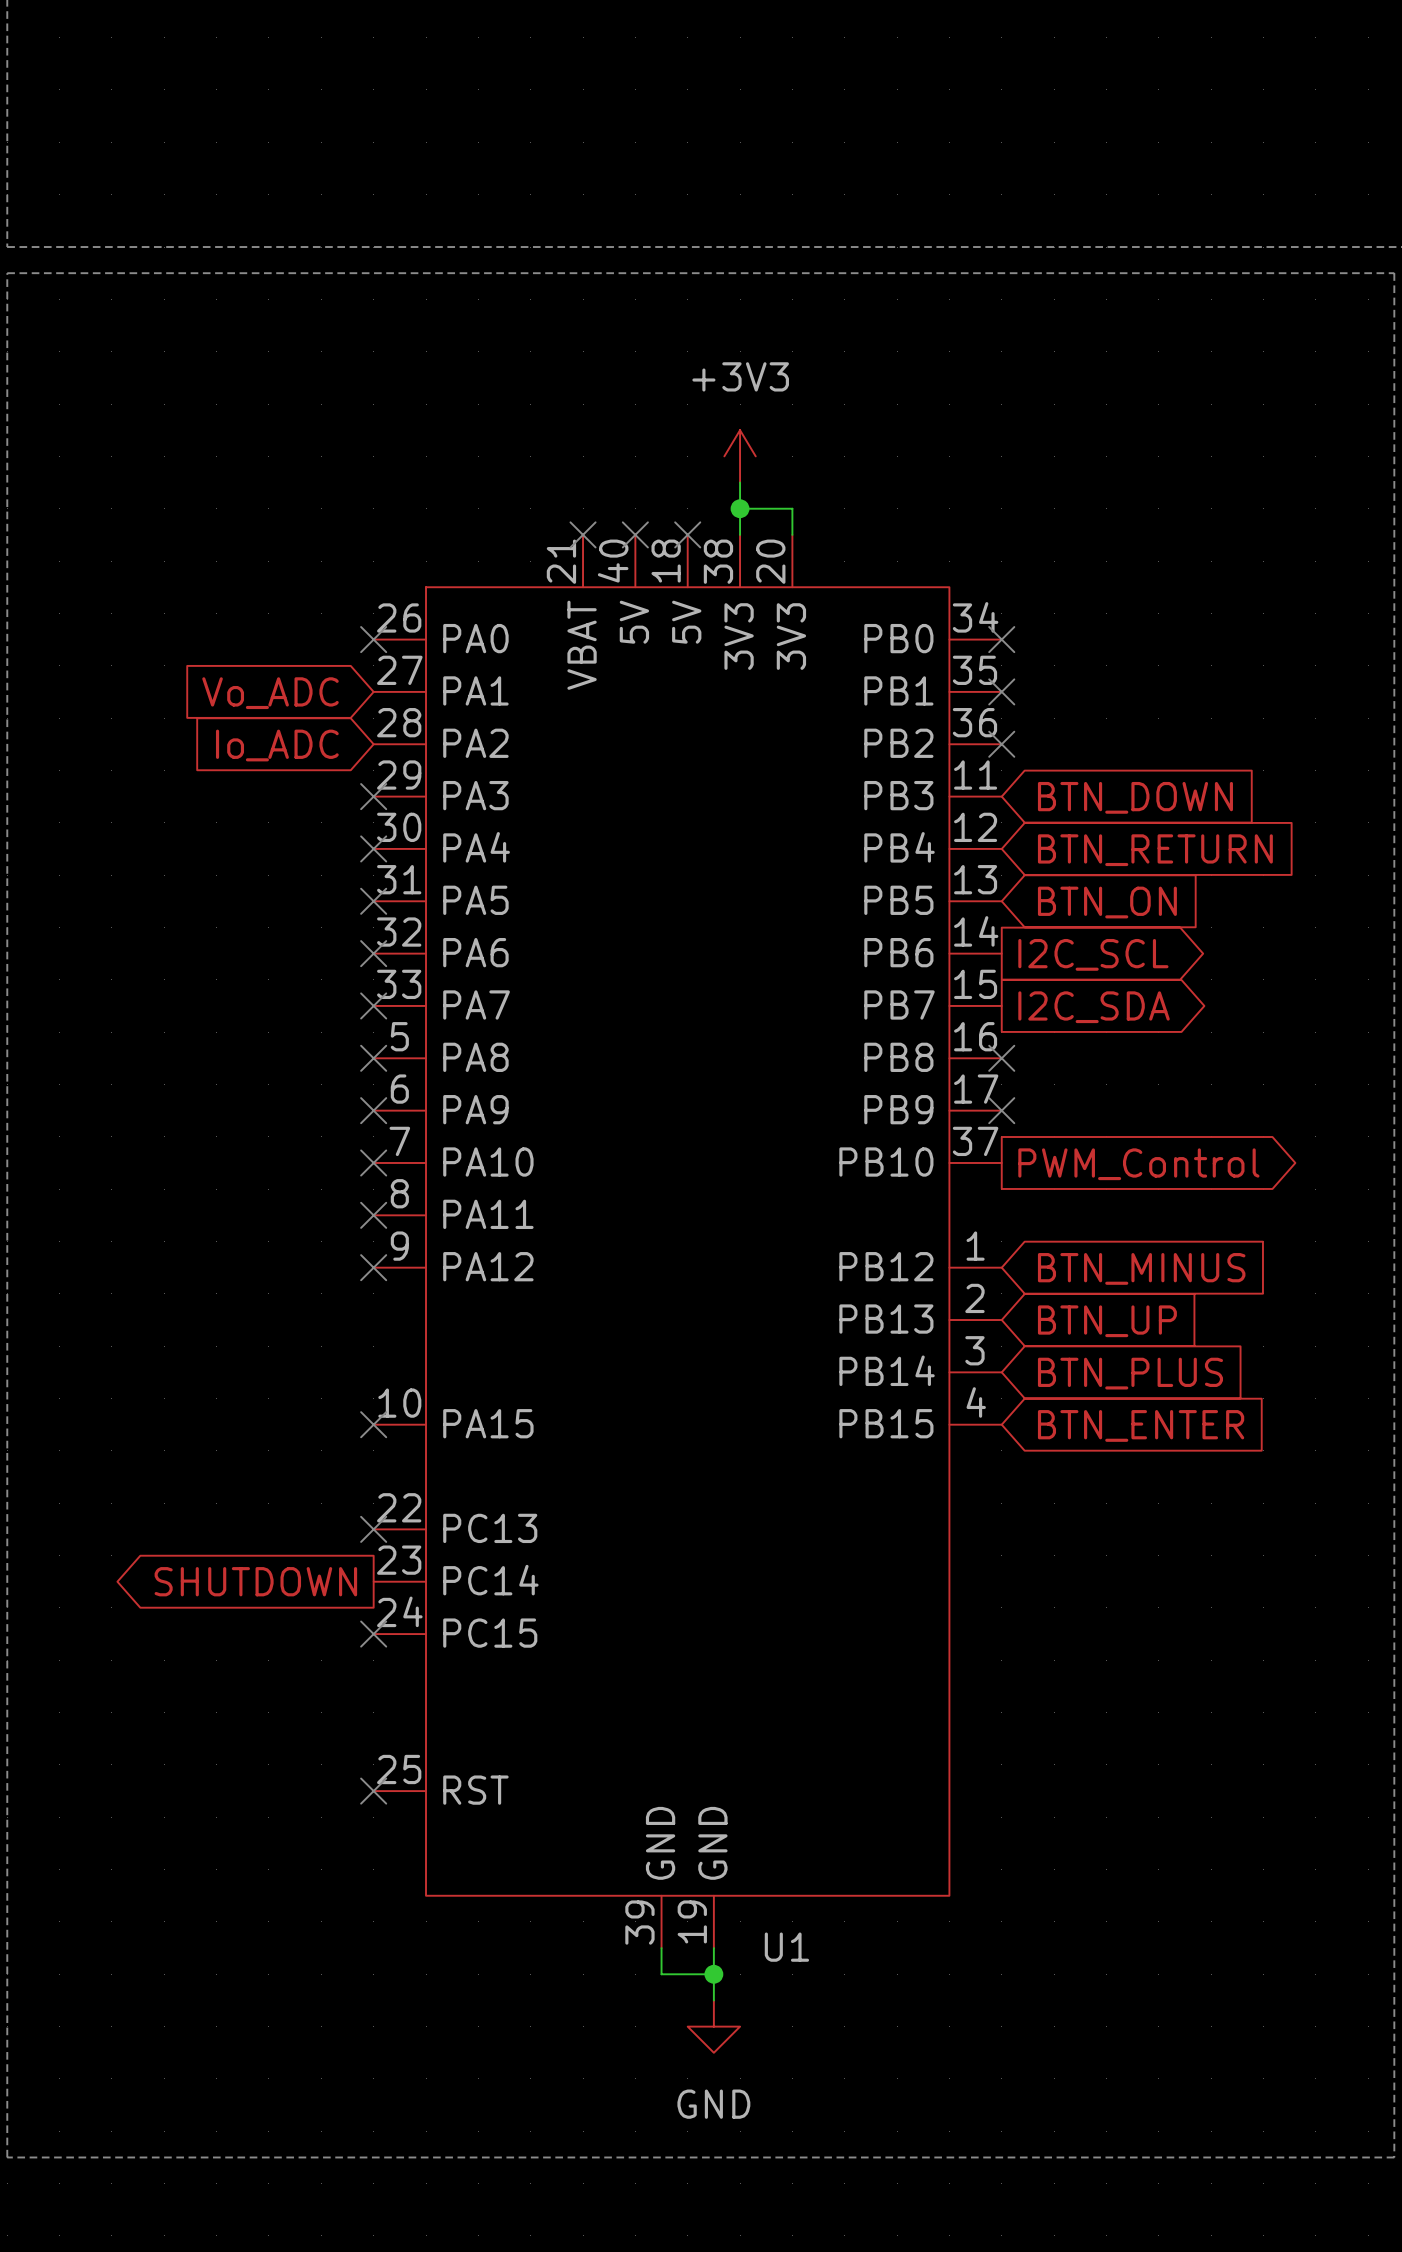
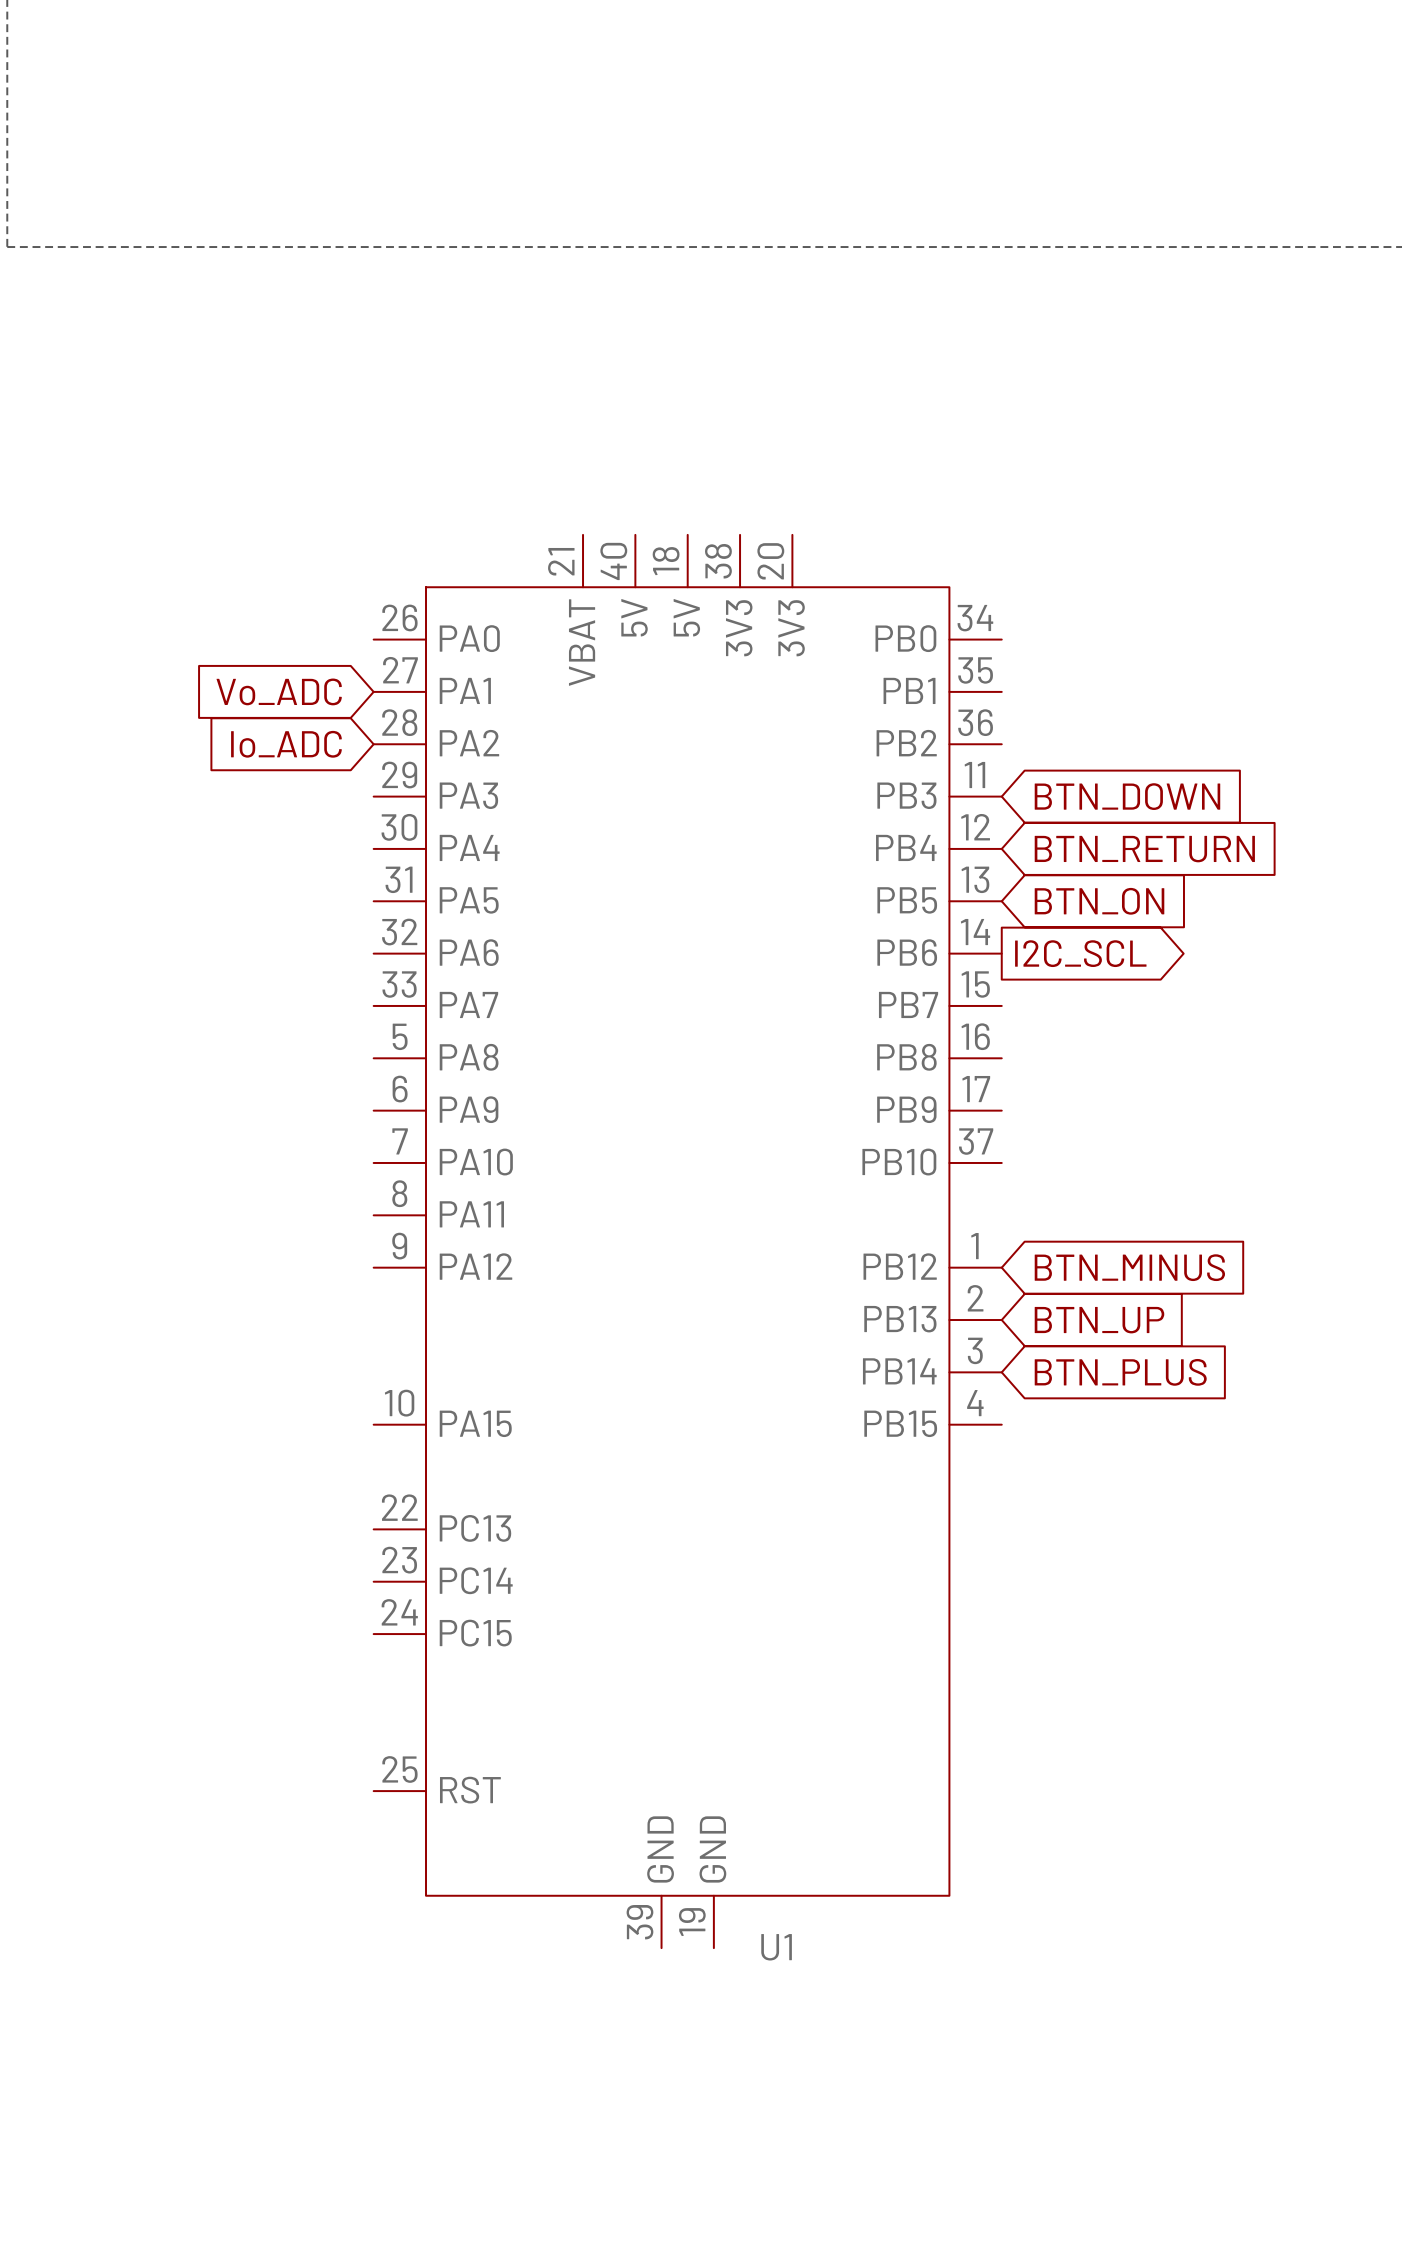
line: (7, 273) (1394, 273) (1394, 2157) (7, 2157) (7, 273) -> none
power symbol: +3V3 (740, 456) -> none
wire: (740, 482) (740, 534) -> none
wire: (740, 508) (792, 508) (792, 534) -> none
junction: (740, 508) -> none
no-connect mark: (583, 534) -> none
no-connect mark: (635, 534) -> none
no-connect mark: (687, 534) -> none
no-connect mark: (373, 639) -> none
no-connect mark: (1001, 639) -> none
no-connect mark: (1001, 691) -> none
no-connect mark: (1001, 744) -> none
no-connect mark: (373, 796) -> none
no-connect mark: (373, 848) -> none
no-connect mark: (373, 901) -> none
no-connect mark: (373, 953) -> none
no-connect mark: (373, 1005) -> none
global label: I2C_SDA (1094, 1007) -> none
no-connect mark: (373, 1058) -> none
no-connect mark: (1001, 1058) -> none
no-connect mark: (373, 1110) -> none
no-connect mark: (1001, 1110) -> none
no-connect mark: (373, 1162) -> none
global label: PWM_Control (1138, 1164) -> none
no-connect mark: (373, 1215) -> none
no-connect mark: (373, 1267) -> none
no-connect mark: (373, 1424) -> none
global label: BTN_ENTER (1141, 1425) -> none
no-connect mark: (373, 1529) -> none
global label: SHUTDOWN (255, 1581) -> none
no-connect mark: (373, 1634) -> none
no-connect mark: (373, 1791) -> none
wire: (661, 1948) (661, 1974) (713, 1974) -> none
wire: (713, 1948) (713, 2000) -> none
junction: (713, 1974) -> none
power symbol: GND (713, 2026) -> none

